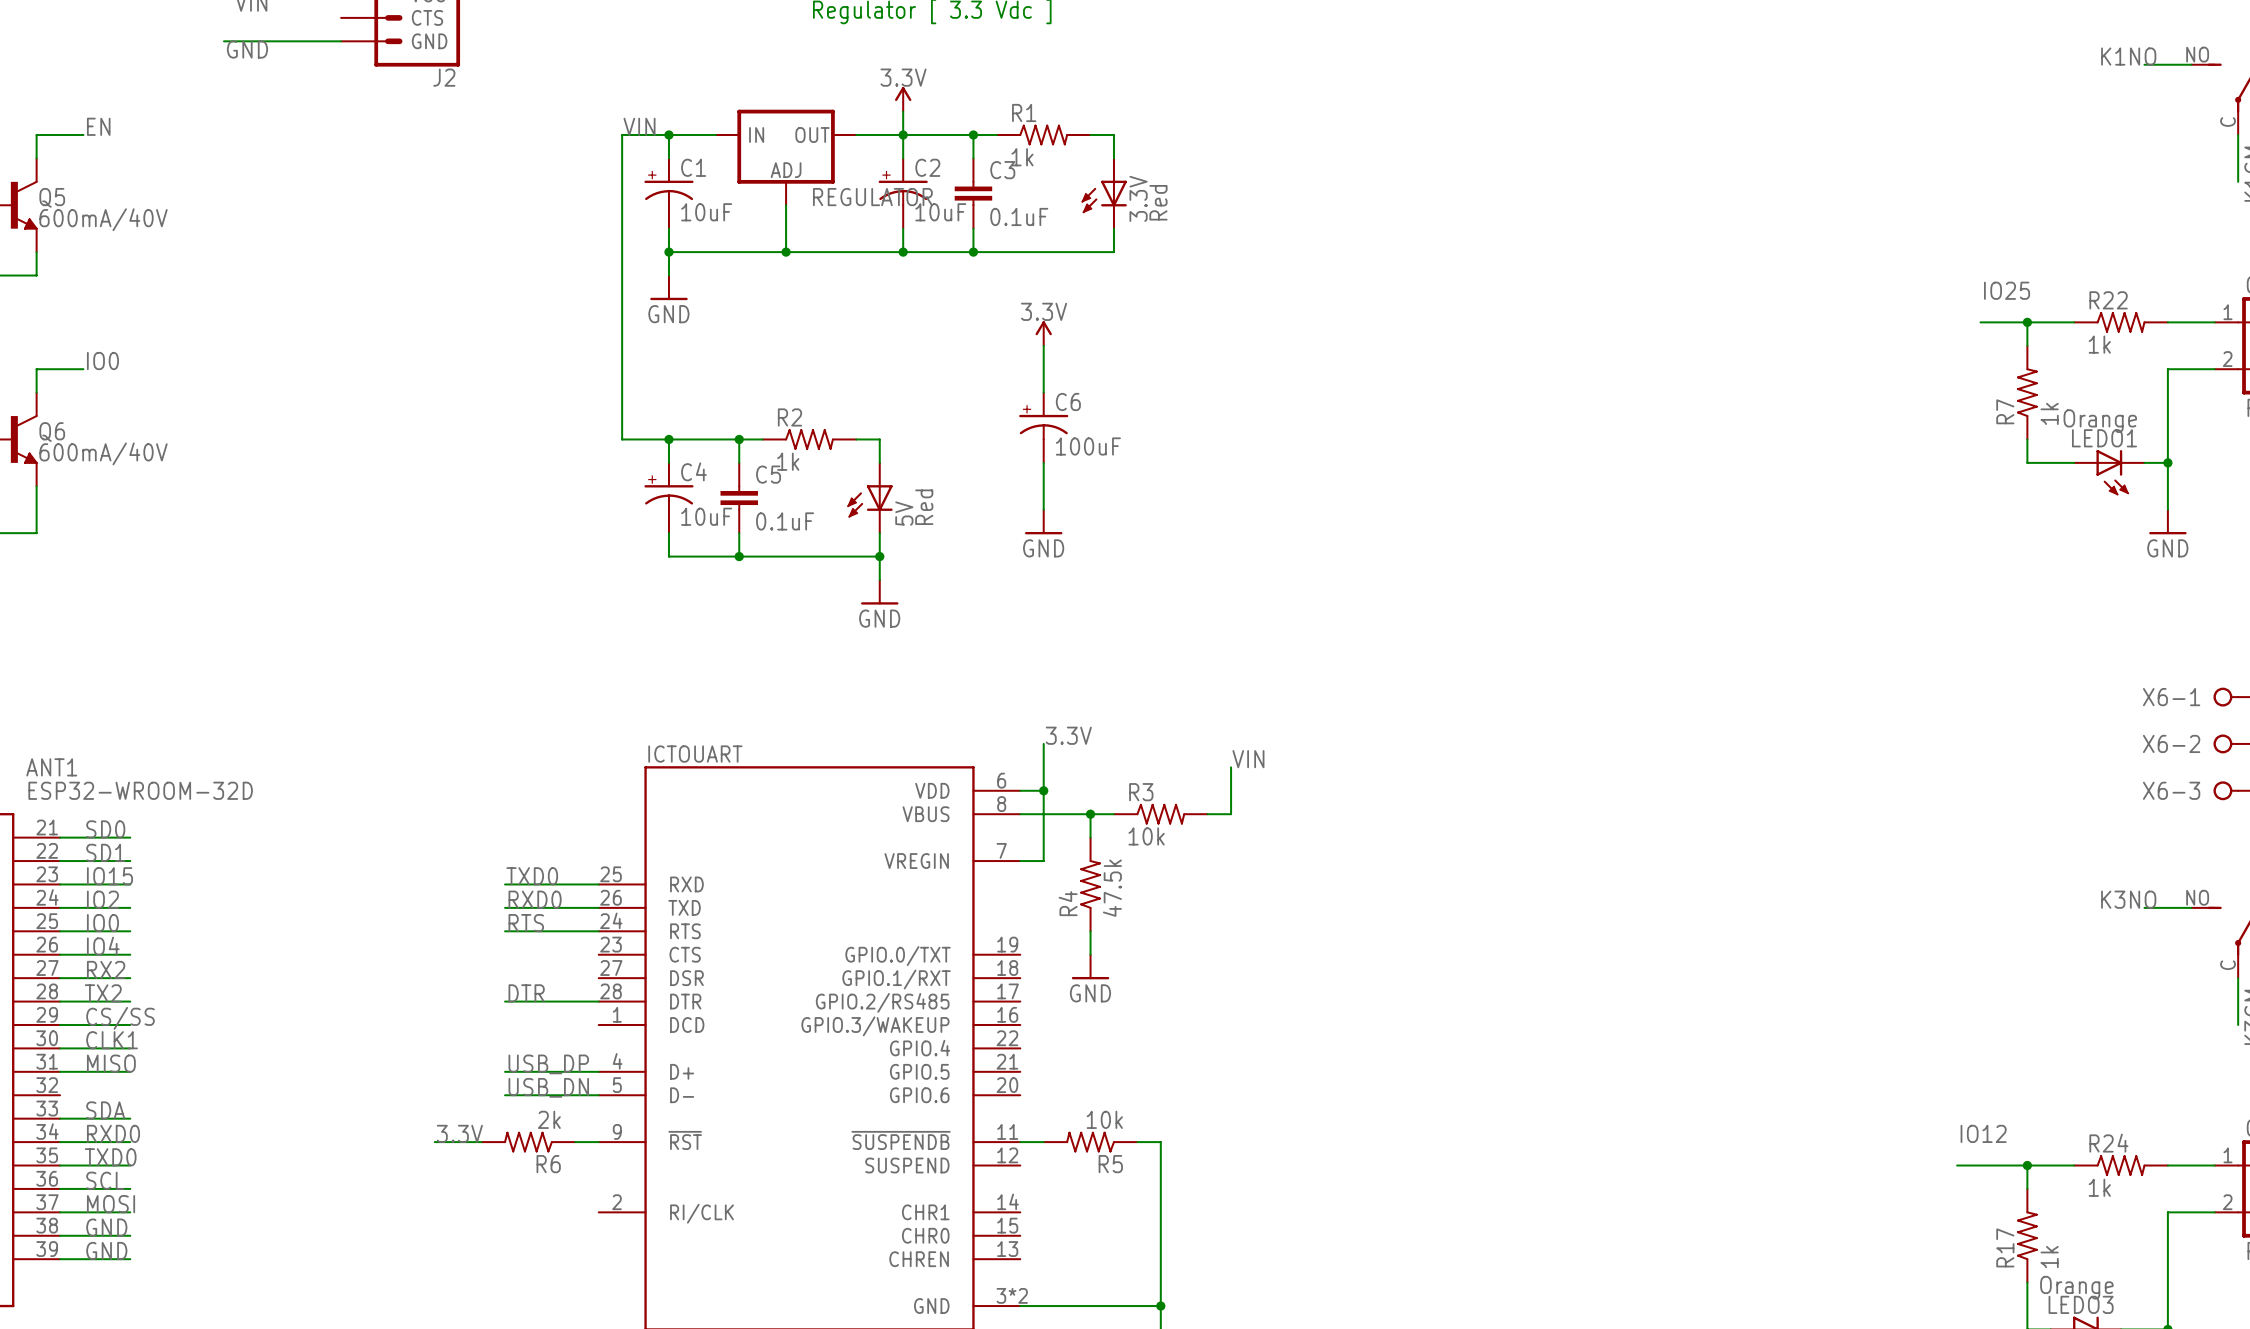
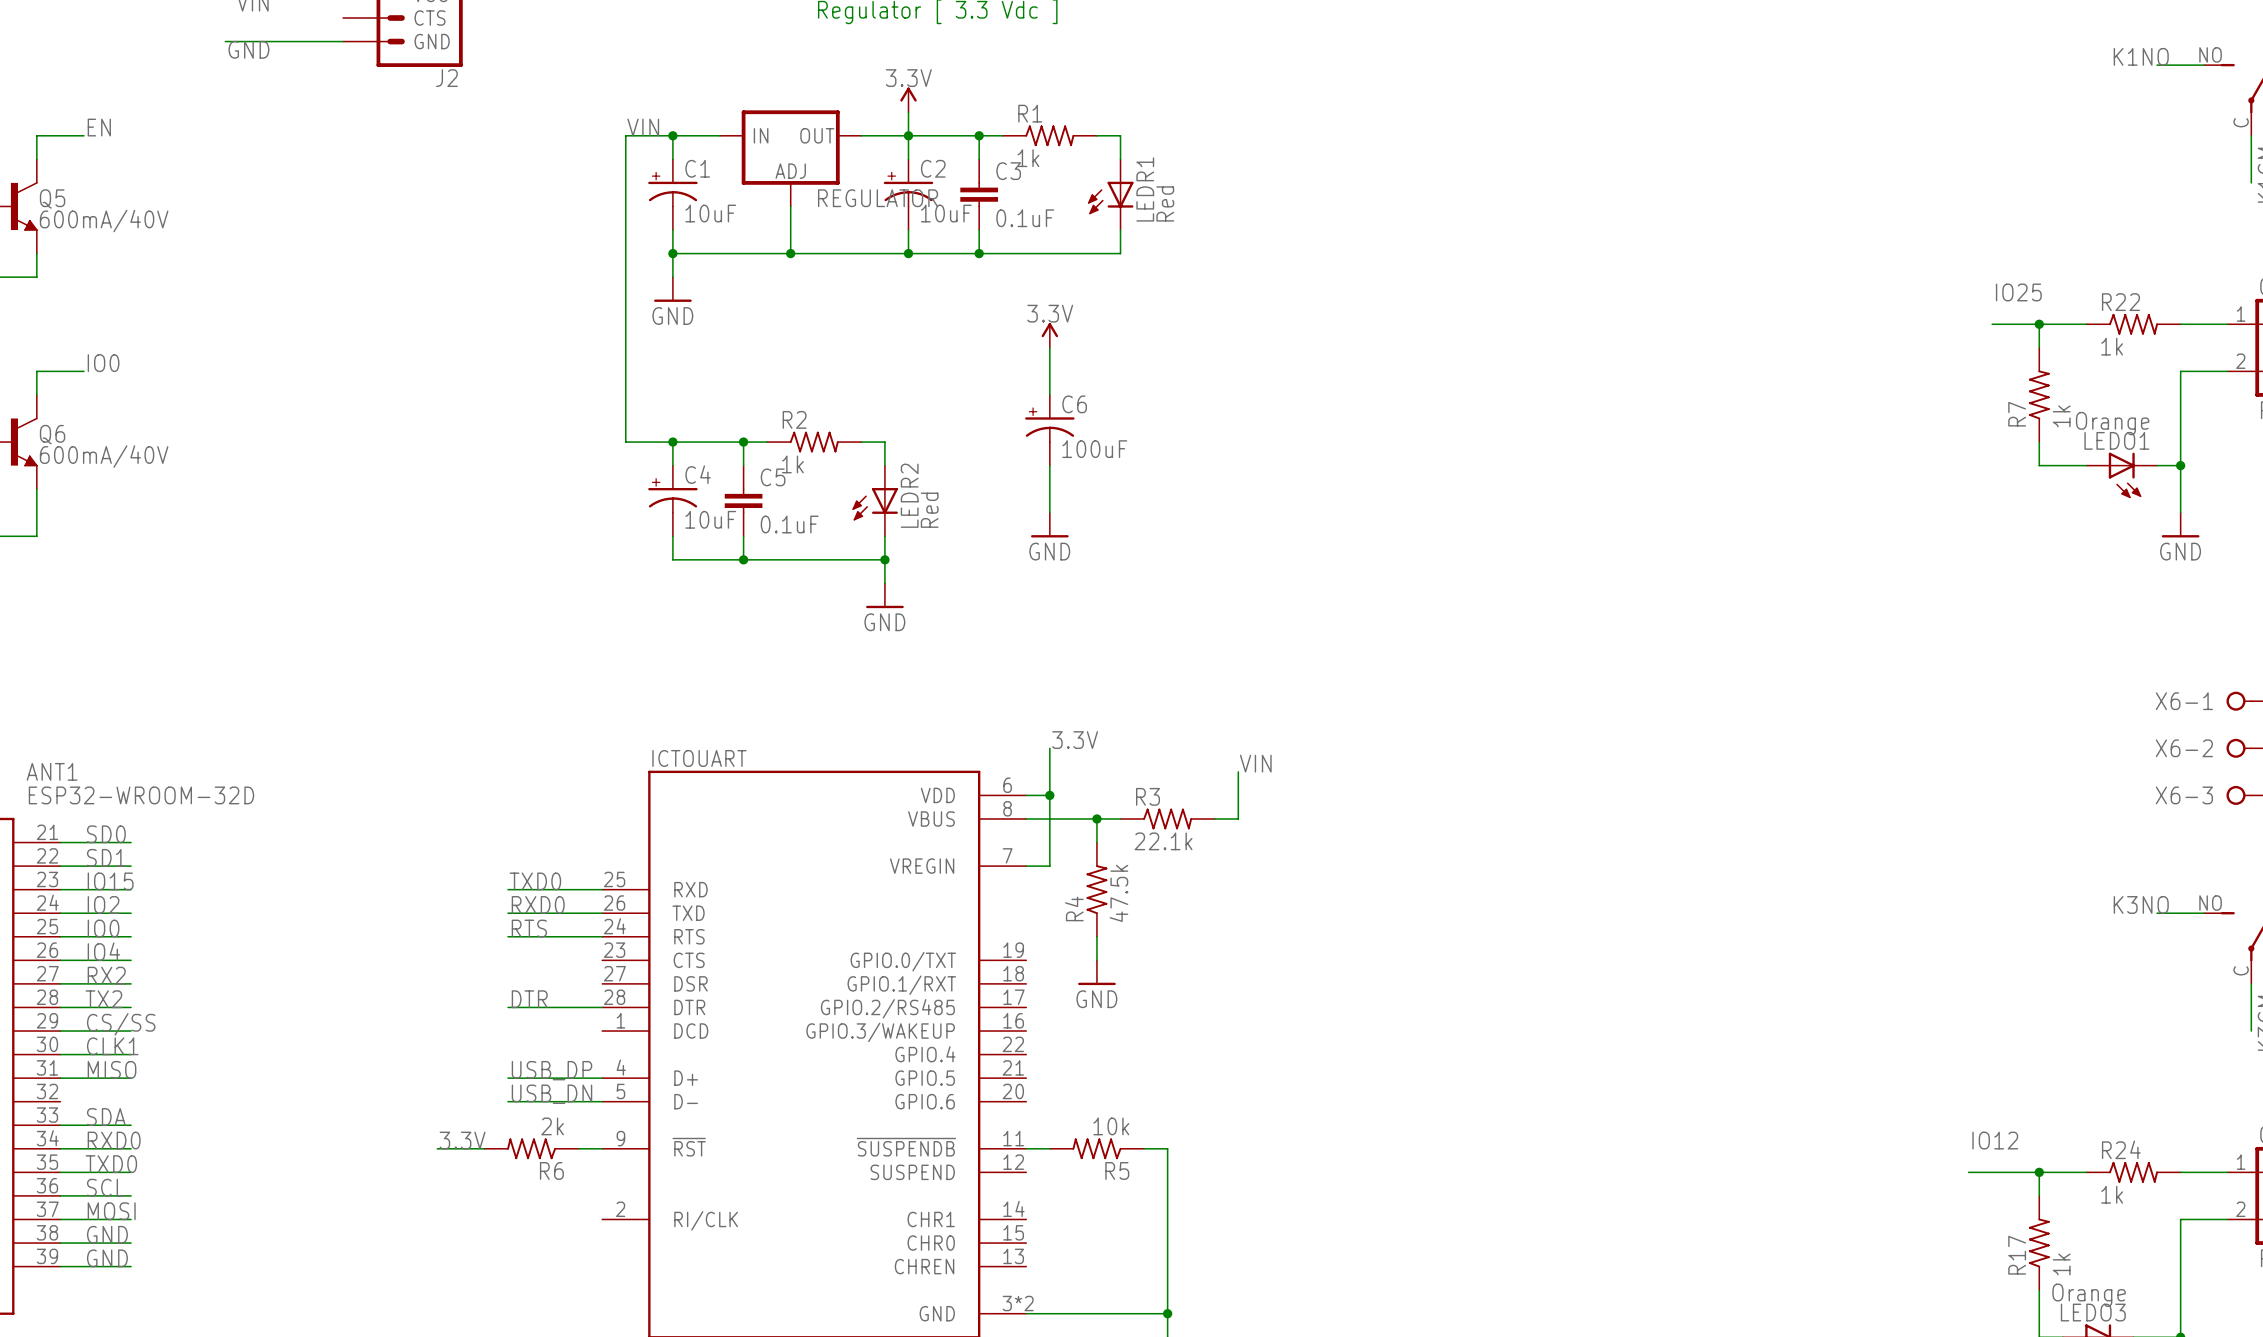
3.3V name: 3.3V (1138, 198) -> LEDR1 (1145, 189)
5V name: 5V (904, 513) -> LEDR2 (909, 495)
R3 value: 10k (1146, 836) -> 22.1k (1163, 841)

